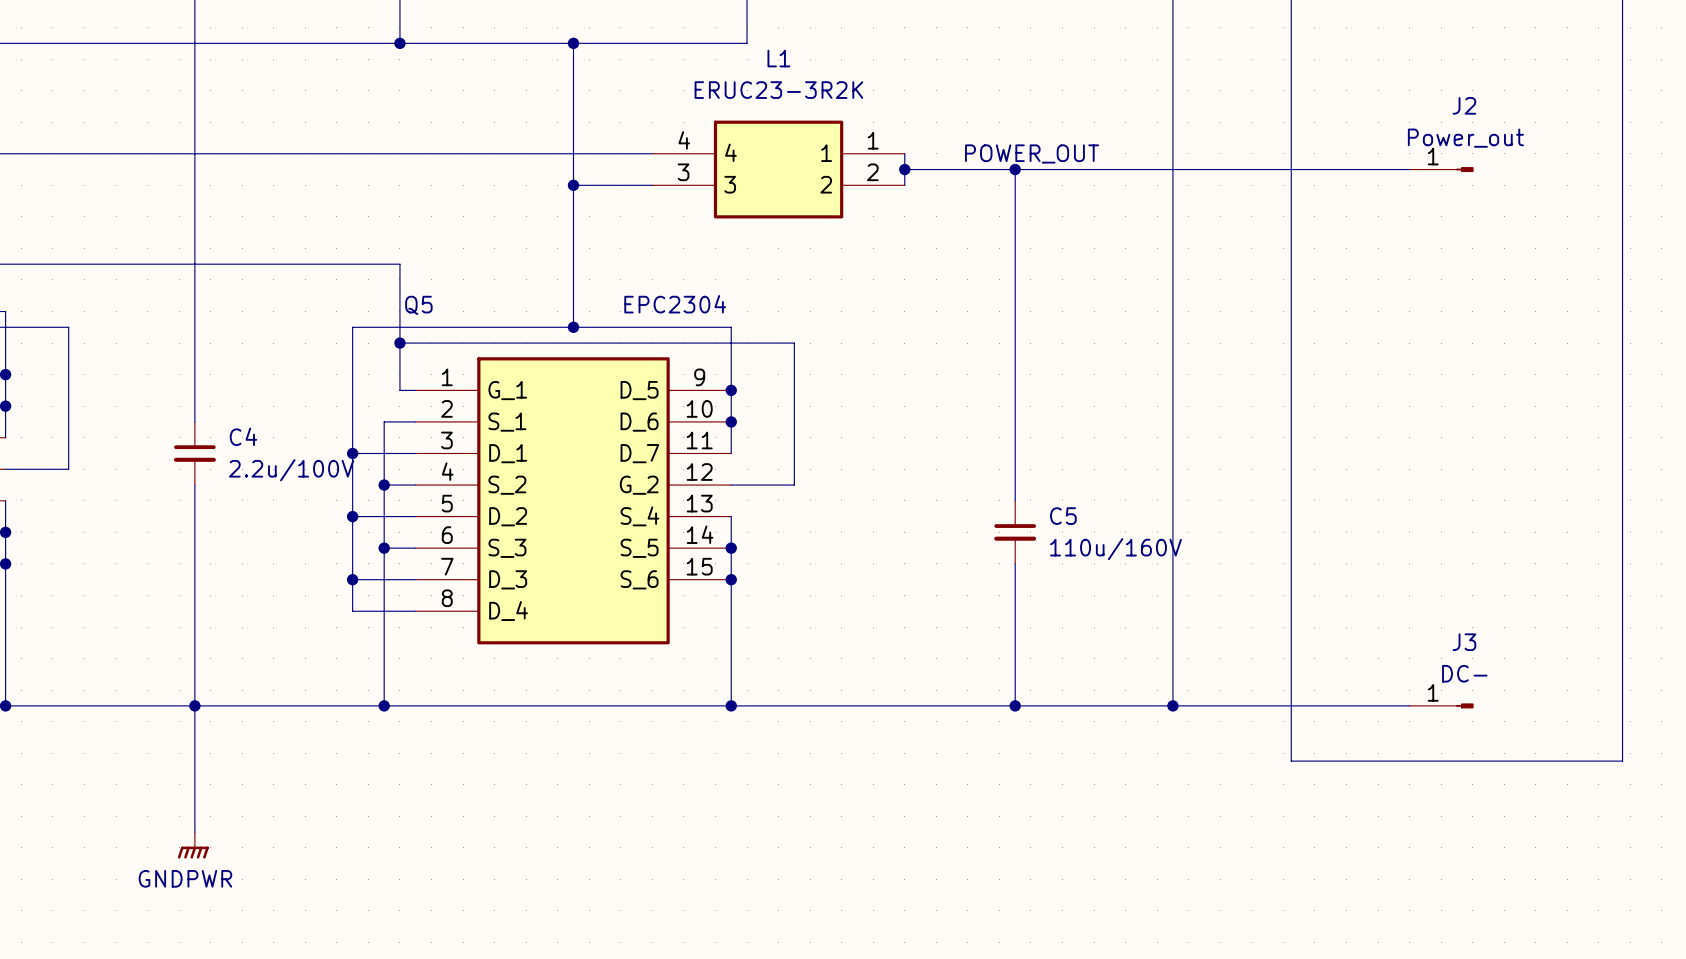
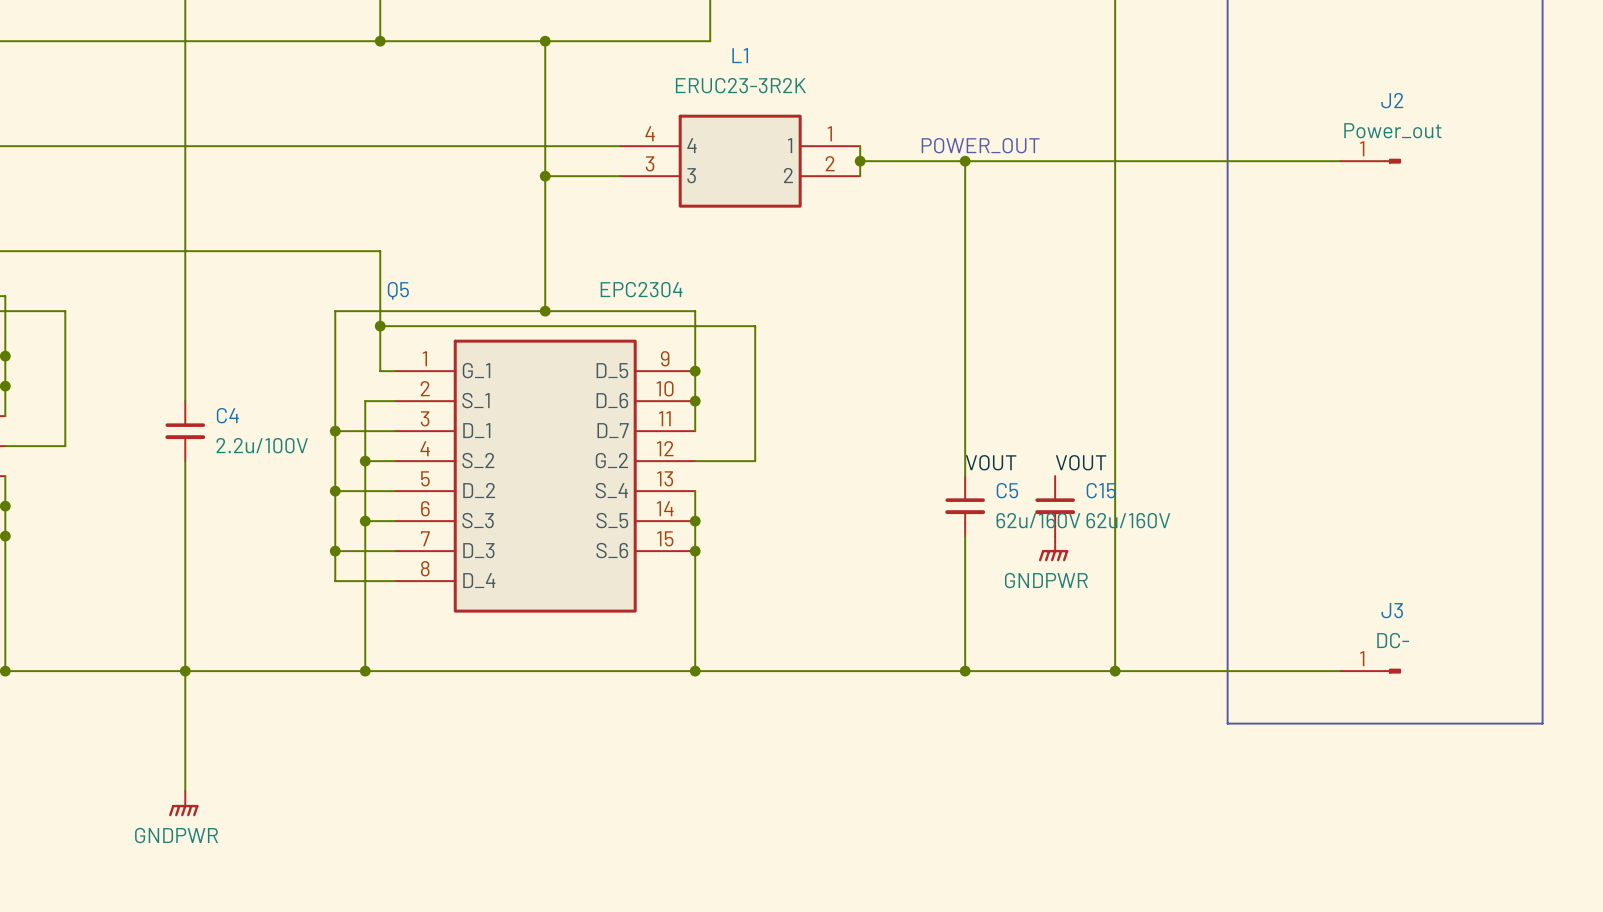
label: none -> VOUT (991, 462)
label: none -> VOUT (1081, 462)
C15: none -> 62u/160V (1055, 506)
C5 value: 110u/160V (1115, 549) -> 62u/160V (1038, 520)
power symbol: none -> GNDPWR (1053, 548)

